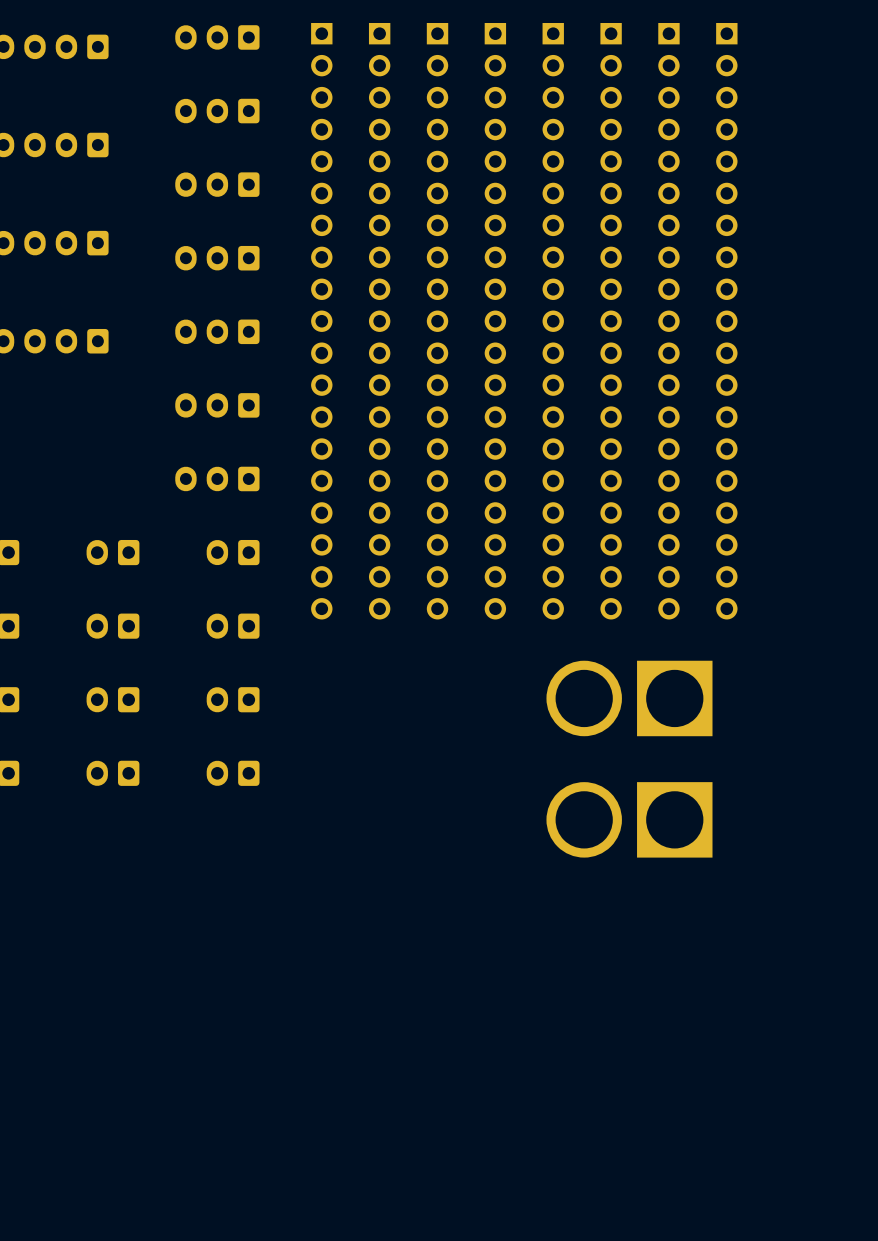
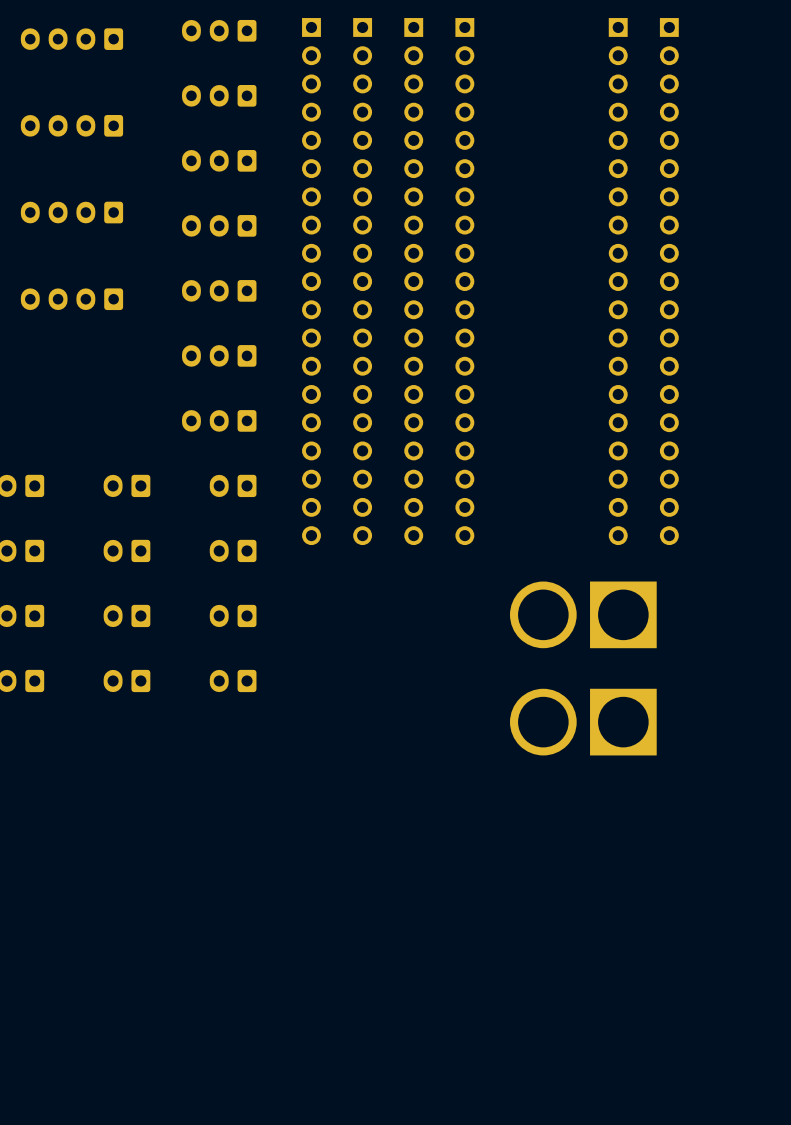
part: (553, 321) -> none
part: (611, 321) -> none

